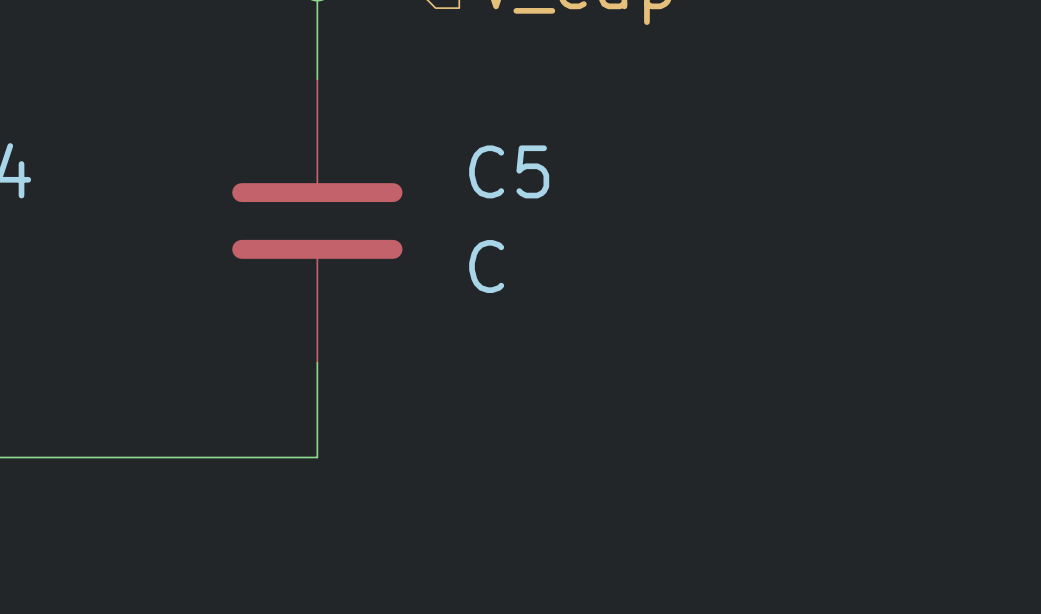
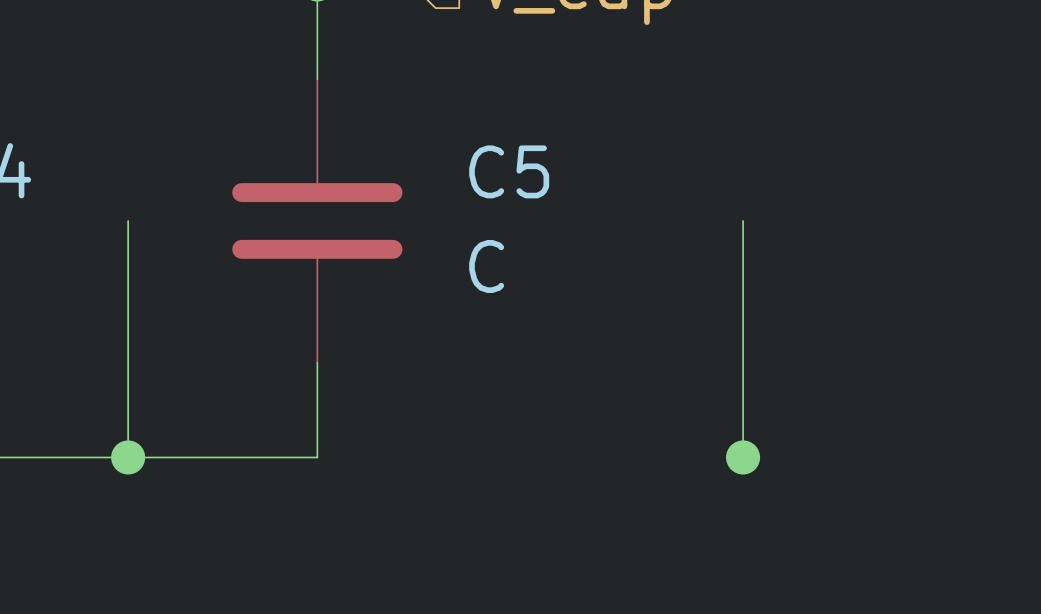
wire: none -> (128, 220) (128, 457)
wire: none -> (743, 220) (743, 457)
junction: none -> (128, 457)
junction: none -> (743, 457)

